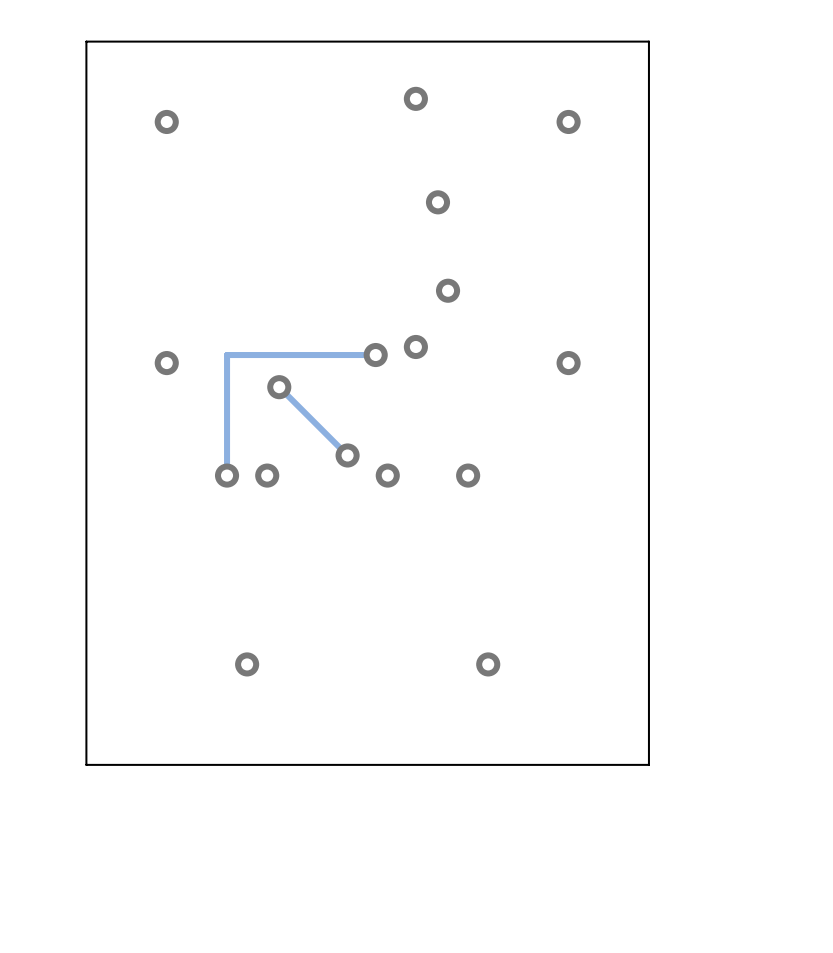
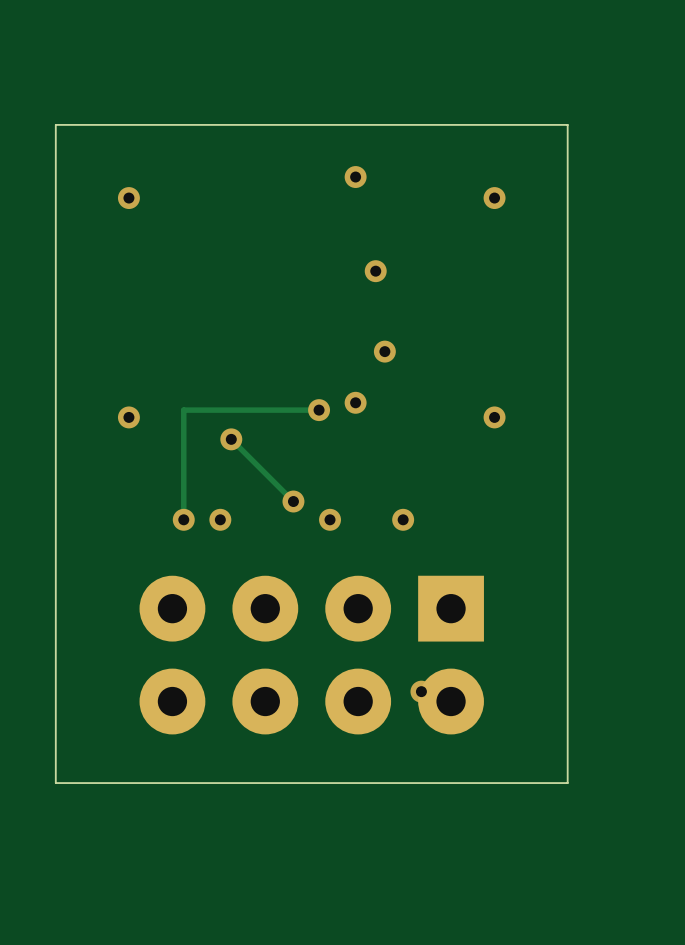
part: none -> (311, 655)
via: (247, 664) -> none

